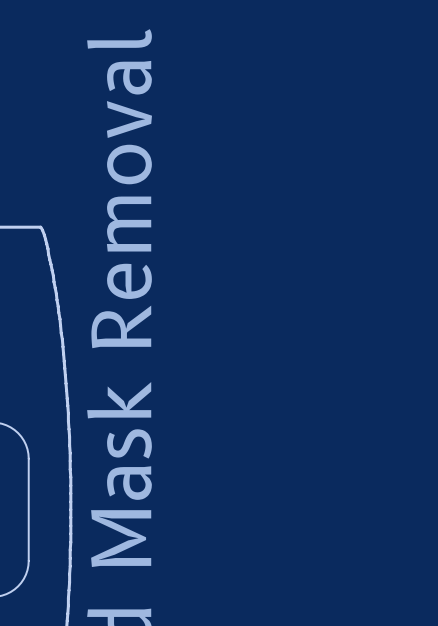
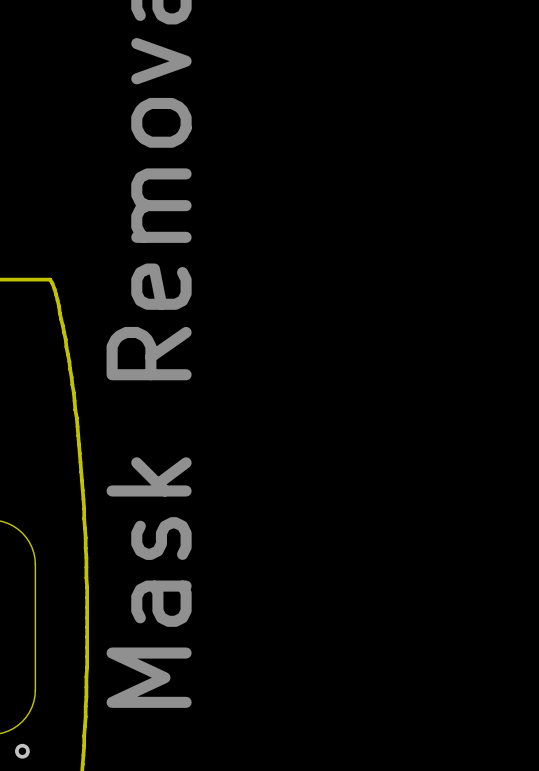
via: none -> (22, 751)

